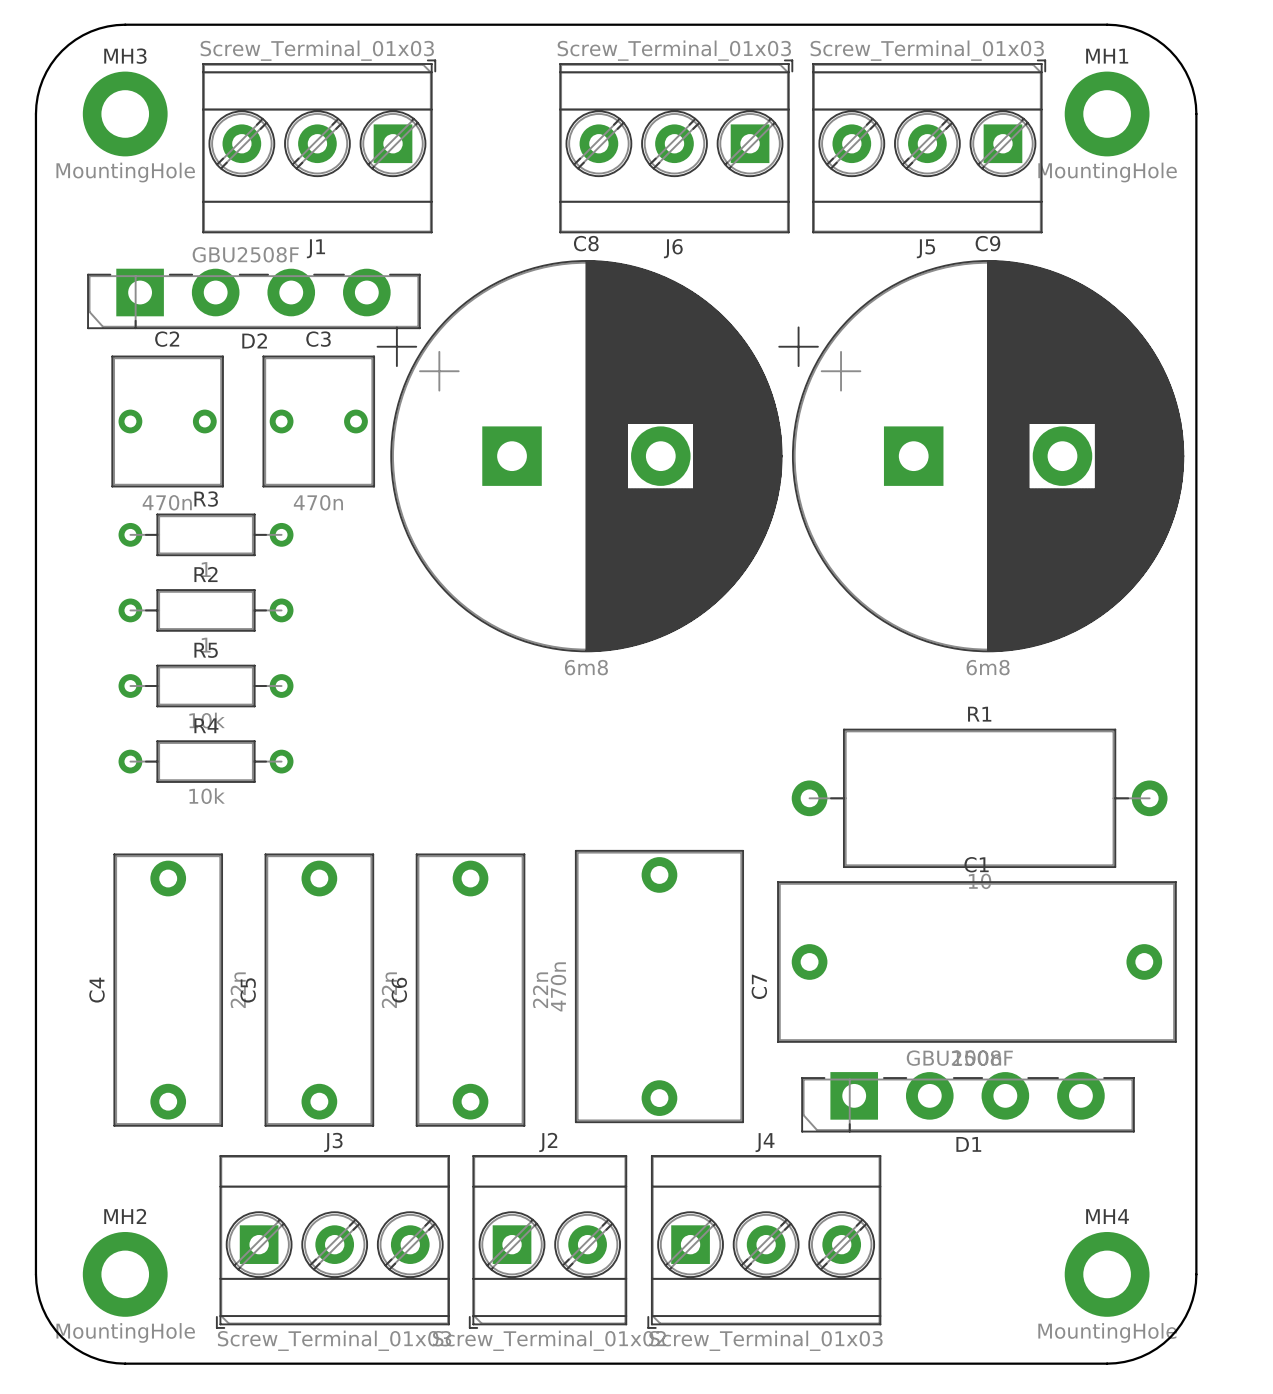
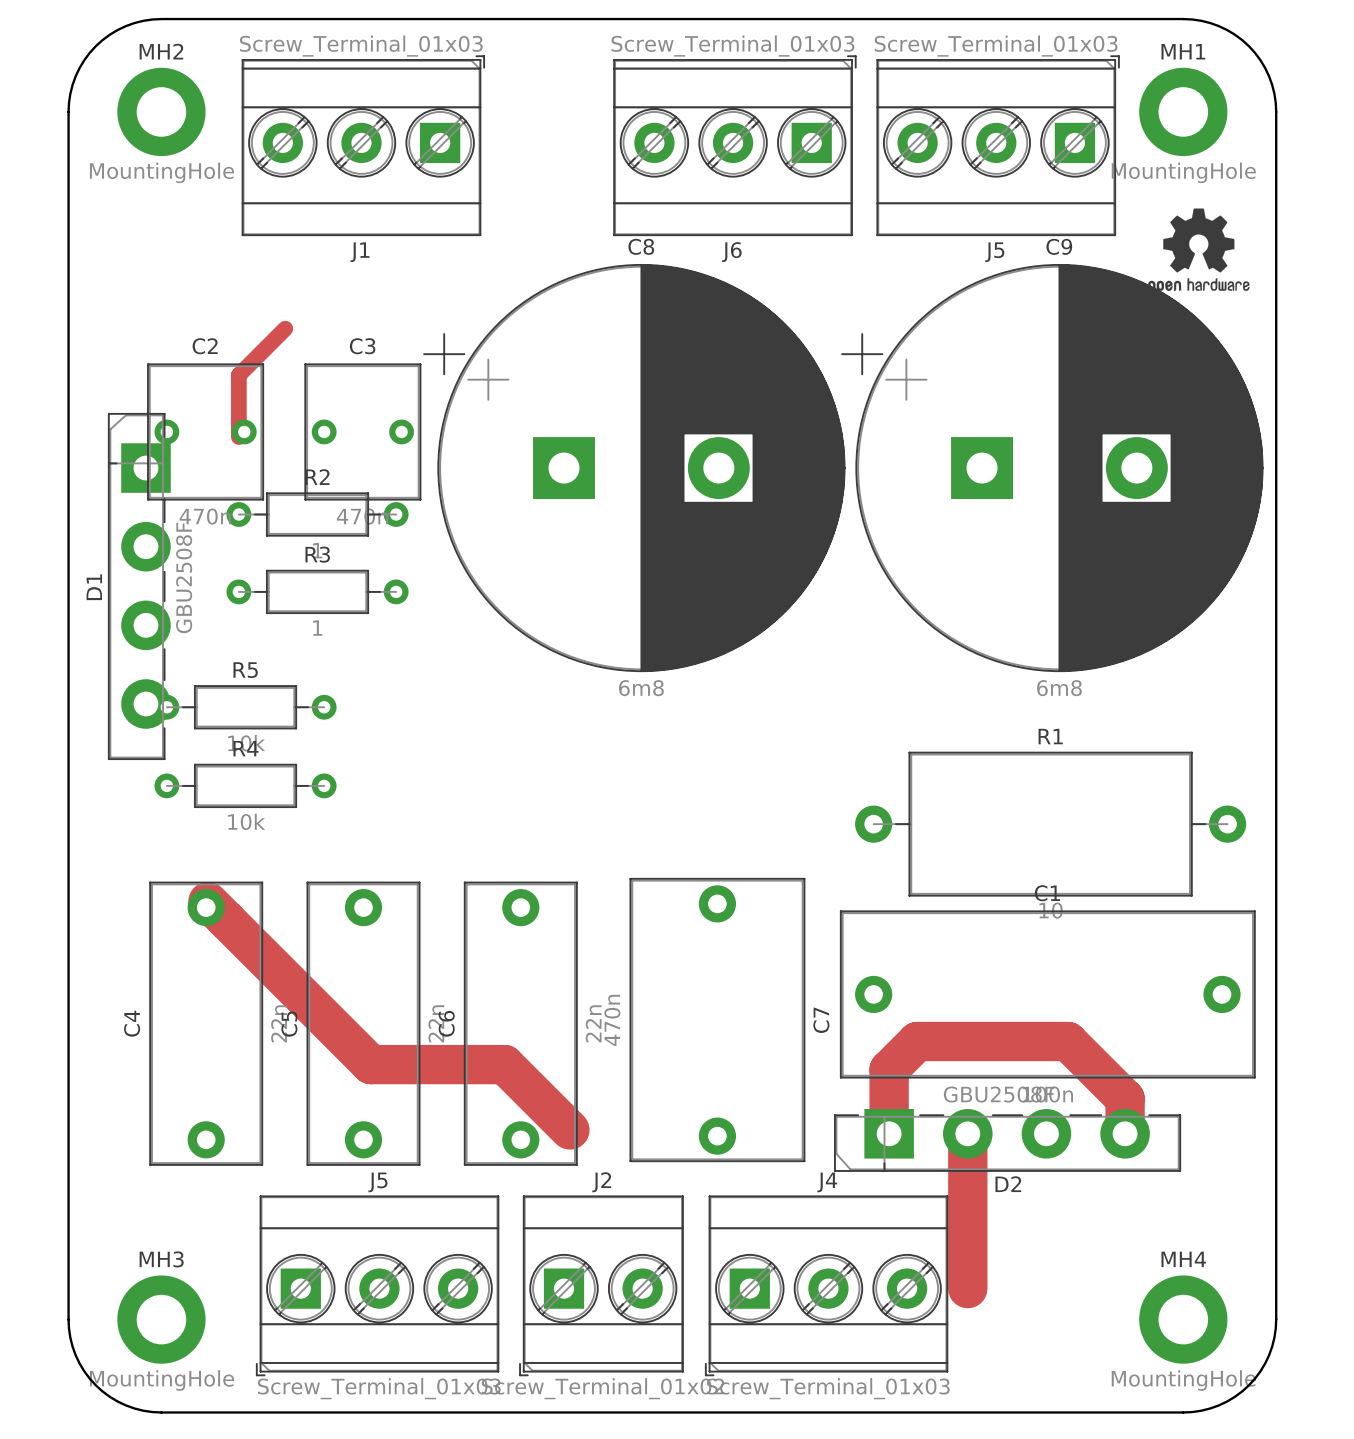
MH3 name: MH3 (125, 56) -> MH2 (161, 51)
drawing: none -> [1148, 208, 1250, 295]
D2 position: (253, 298) -> (1007, 1140)
track: none -> (285, 328) (238, 375) (238, 437)
R3 position: (206, 534) -> (317, 591)
R2 position: (206, 610) -> (317, 514)
track: none -> (207, 901) (370, 1064) (504, 1064) (569, 1130)
track: none -> (889, 1133) (889, 1069) (917, 1041) (1067, 1041) (1125, 1098) (1125, 1133)
track: none -> (967, 1133) (967, 1288)
D1 rotation: 0° (968, 1102) -> 90° clockwise (139, 586)
D1 position: (968, 1102) -> (139, 586)
J3 name: J3 (333, 1142) -> J5 (377, 1182)
MH2 name: MH2 (125, 1216) -> MH3 (161, 1259)

